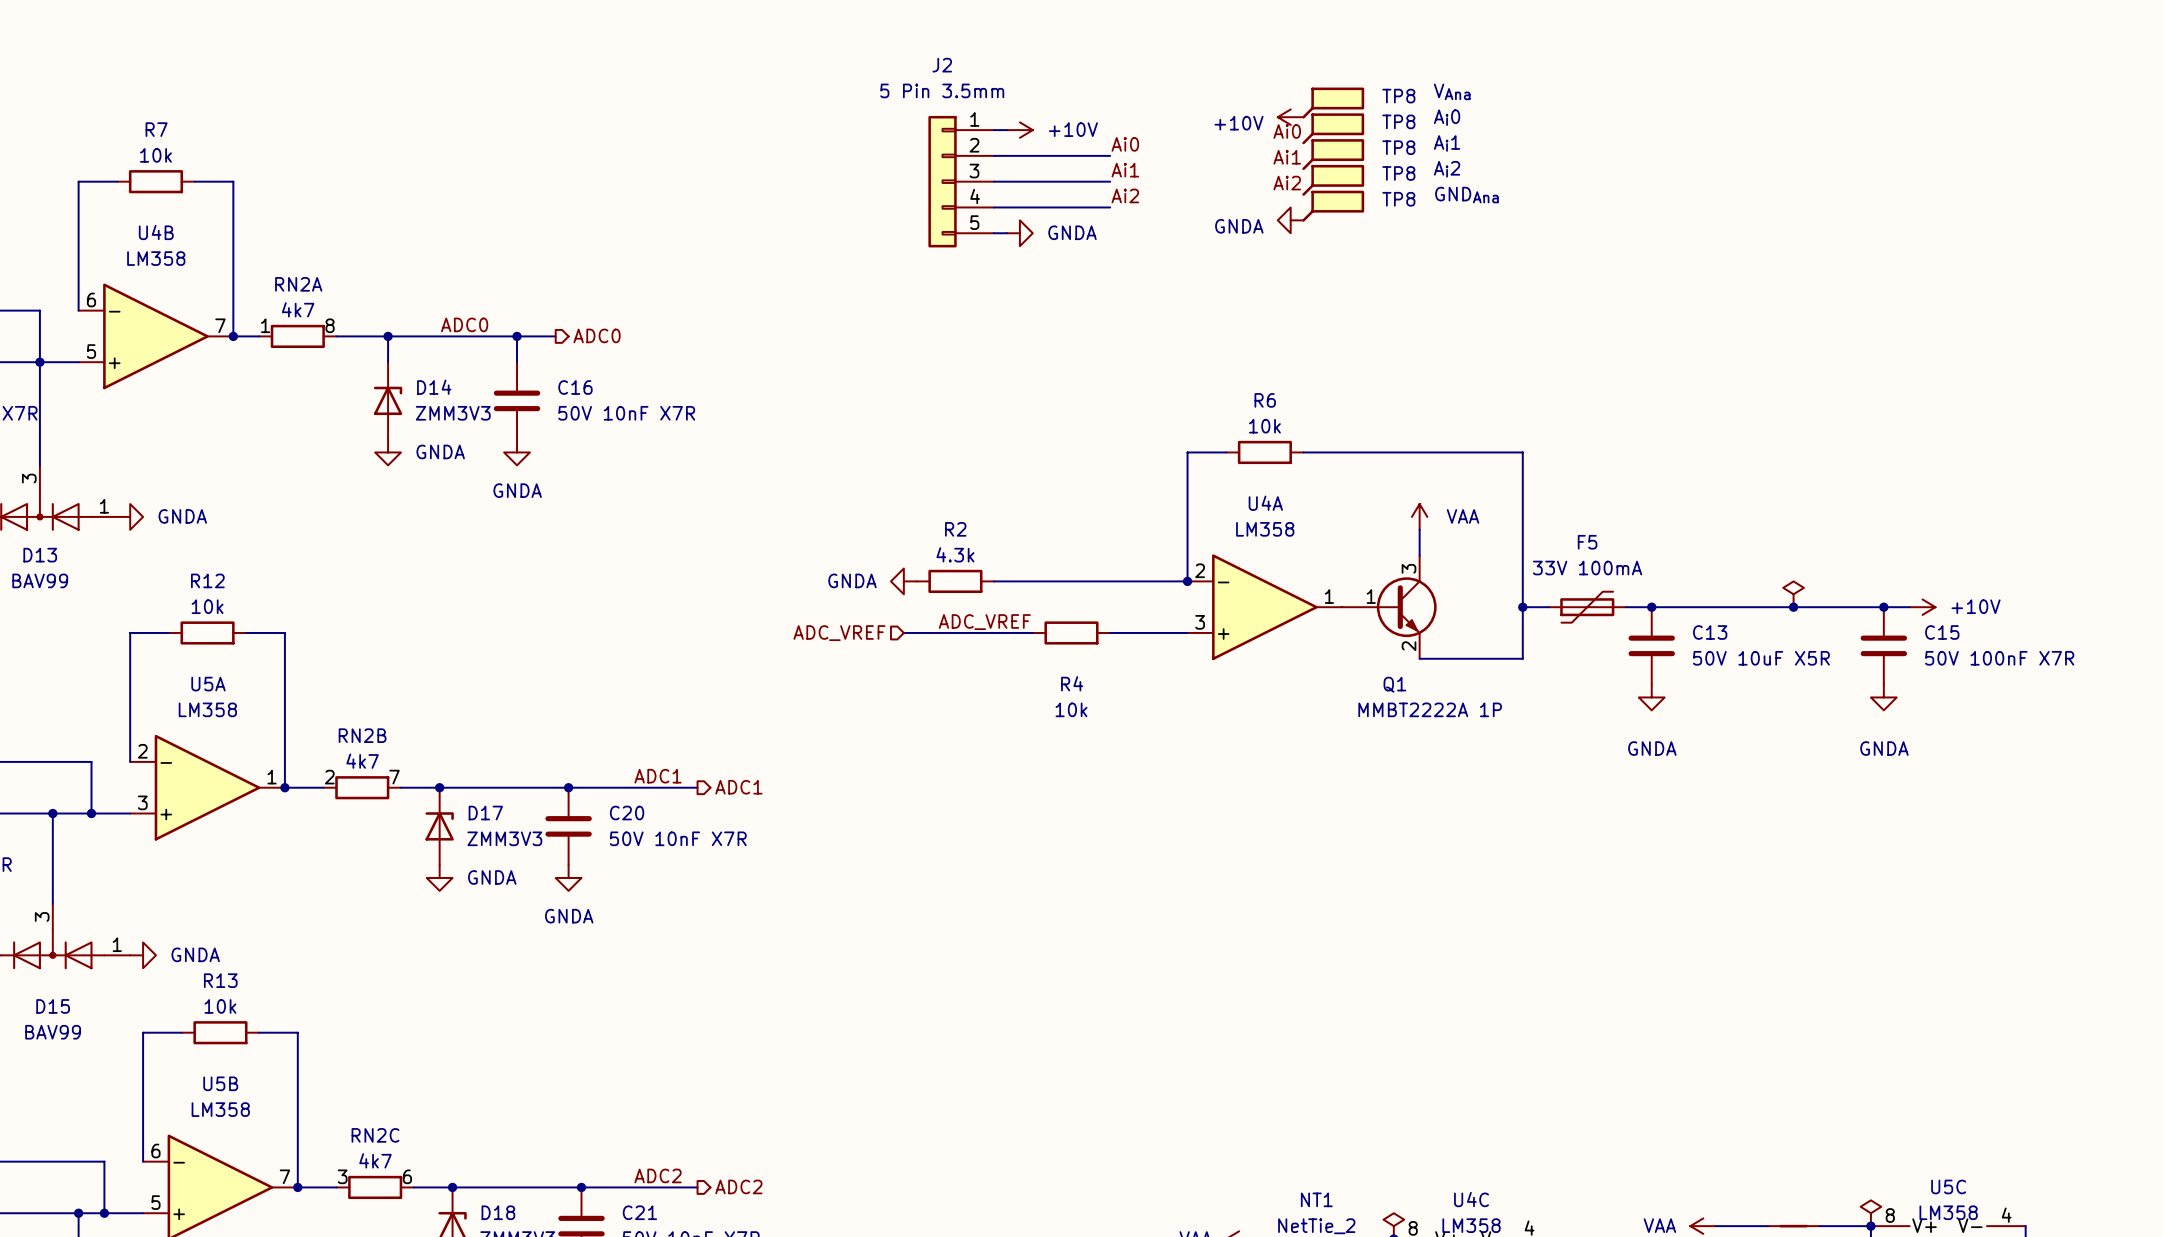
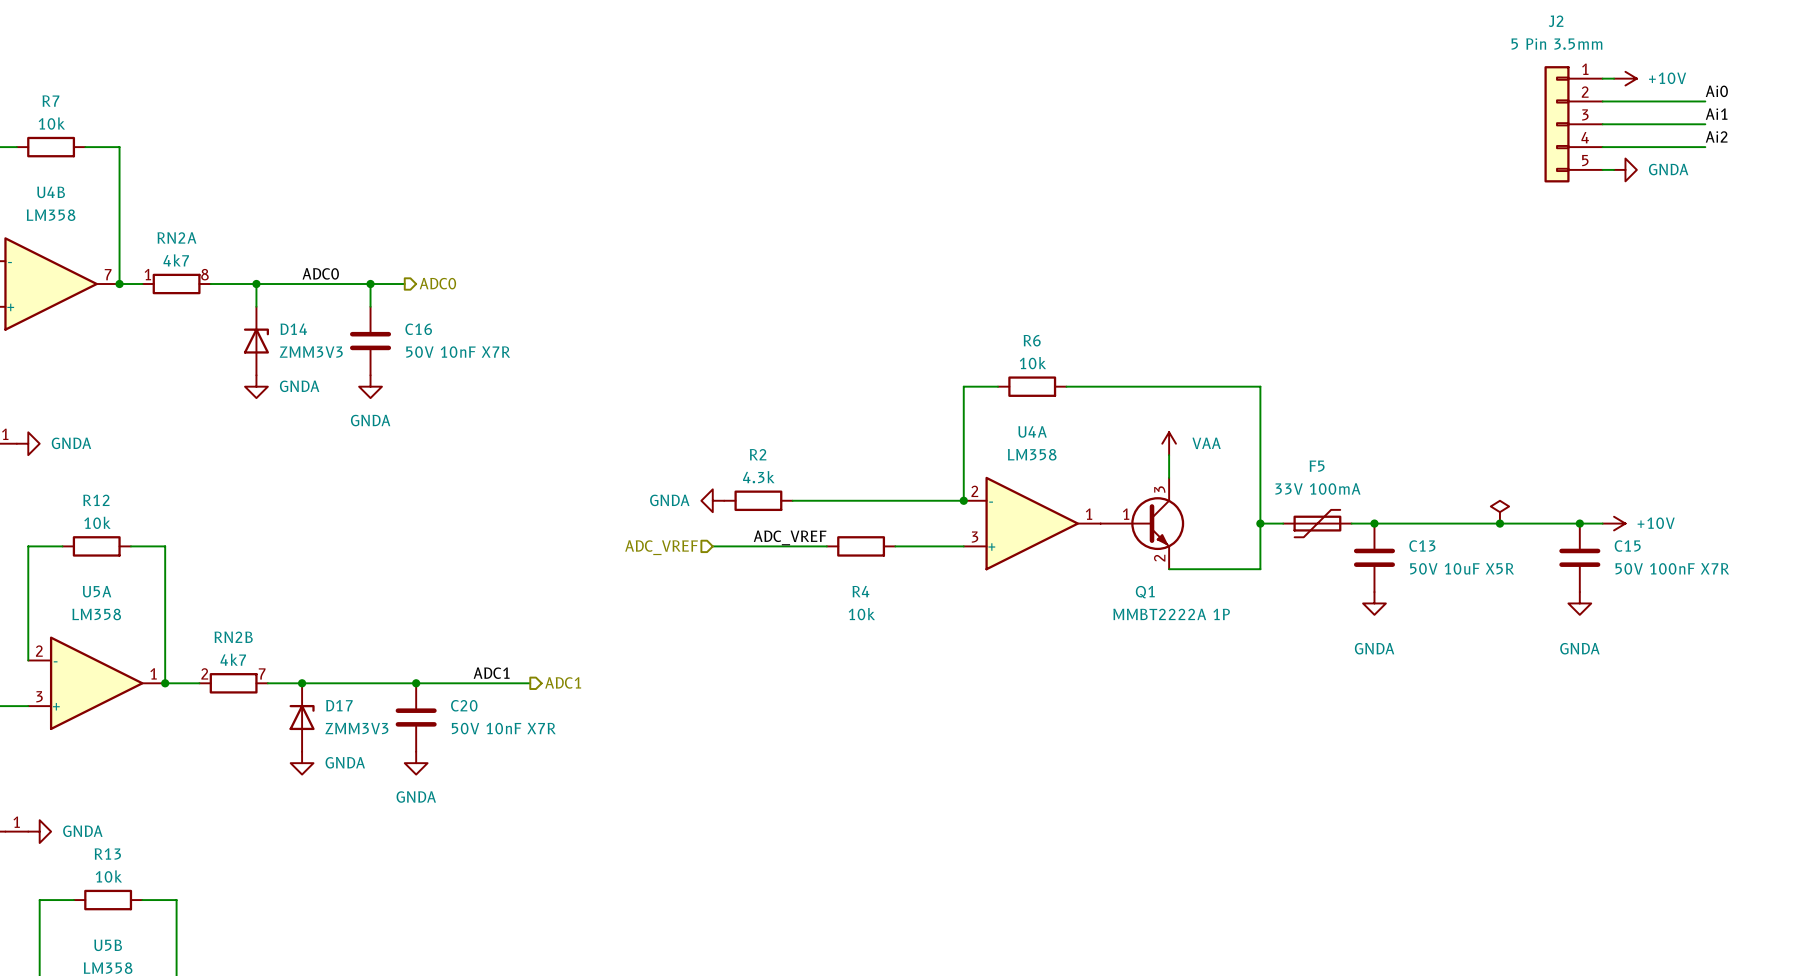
TP8: VAna (1333, 103) -> none
wire: none -> (1602, 78) (1614, 78)
power symbol: none -> +10V (1625, 78)
power symbol: +10V (1290, 117) -> none
label: none -> Ai0 (1716, 91)
TP8: Ai0 (1333, 128) -> none
wire: (994, 130) (1007, 130) -> none
power symbol: +10V (1019, 130) -> none
wire: none -> (1602, 101) (1705, 101)
label: Ai0 (1287, 131) -> none
label: Ai0 (1125, 144) -> none
label: none -> Ai1 (1716, 114)
TP8: Ai1 (1333, 154) -> none
wire: (994, 155) (1110, 155) -> none
wire: none -> (1602, 124) (1705, 124)
label: Ai1 (1287, 157) -> none
label: Ai1 (1125, 170) -> none
label: none -> Ai2 (1716, 136)
TP8: Ai2 (1333, 180) -> none
J2 position: (961, 181) -> (1573, 124)
wire: (994, 181) (1110, 181) -> none
wire: none -> (1602, 147) (1705, 147)
label: Ai2 (1287, 183) -> none
label: Ai2 (1125, 195) -> none
TP8: GNDAna (1333, 206) -> none
wire: (994, 207) (1110, 207) -> none
wire: none -> (1602, 169) (1614, 169)
power symbol: none -> GNDA (1625, 169)
power symbol: GNDA (1290, 220) -> none
wire: (994, 233) (1007, 233) -> none
power symbol: GNDA (1019, 233) -> none

